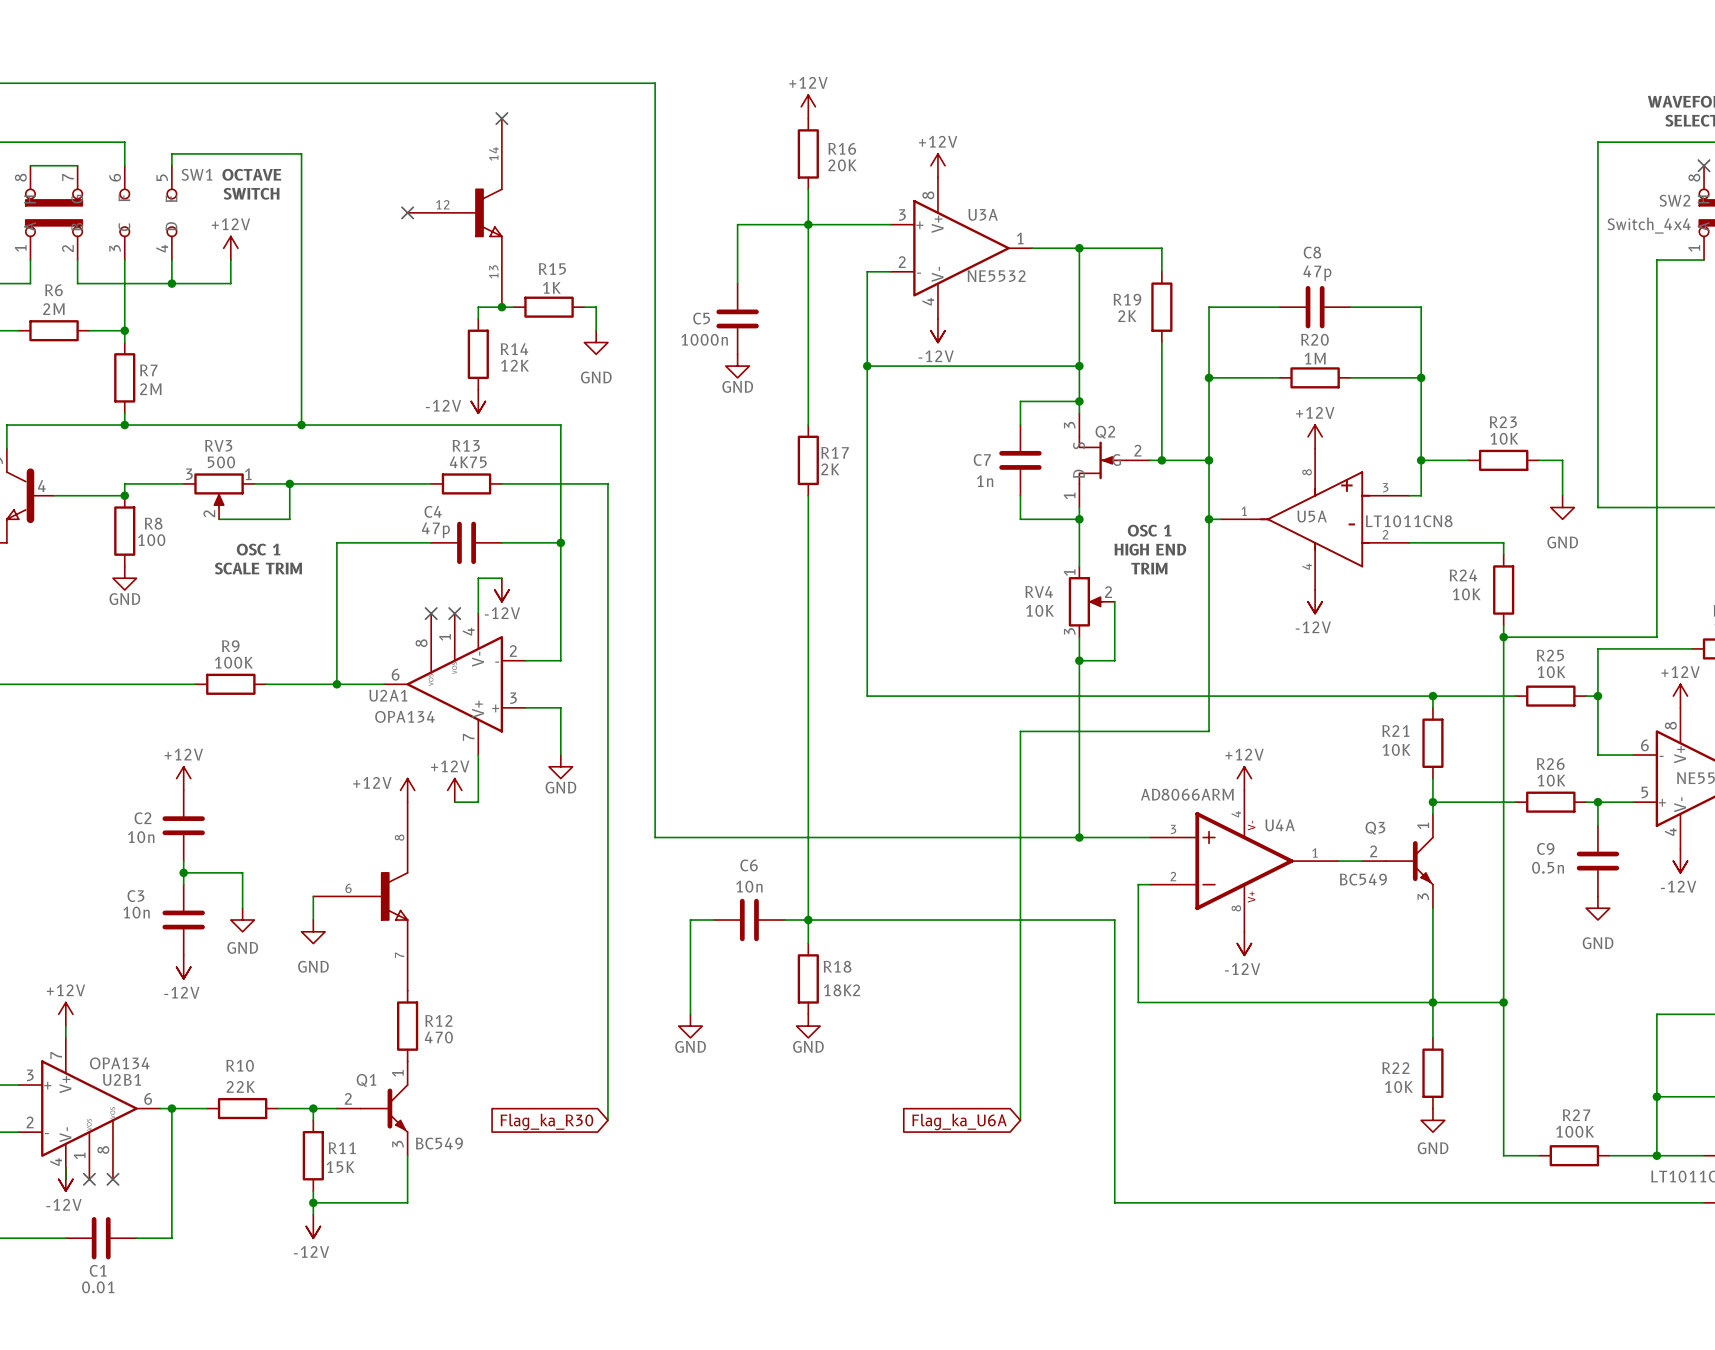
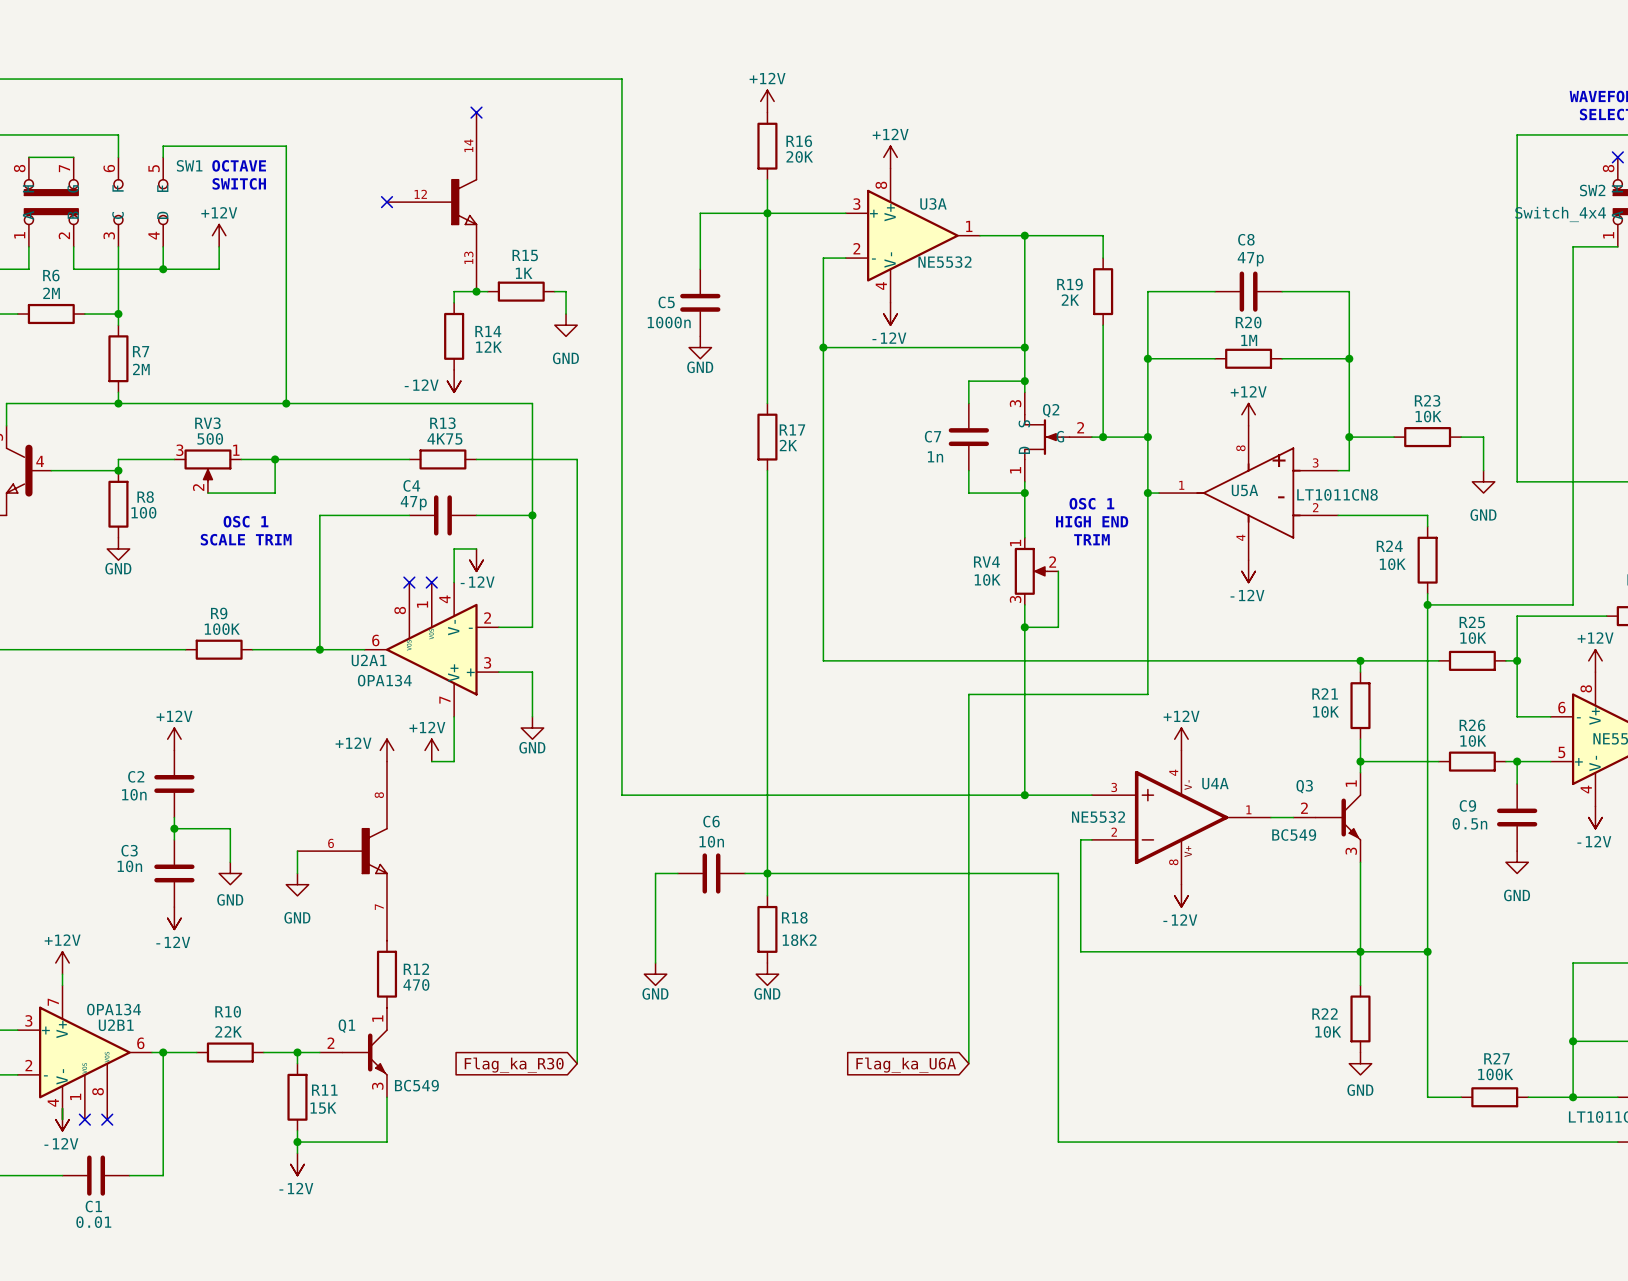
U4A value: AD8066ARM (1187, 794) -> NE5532 (1098, 817)

